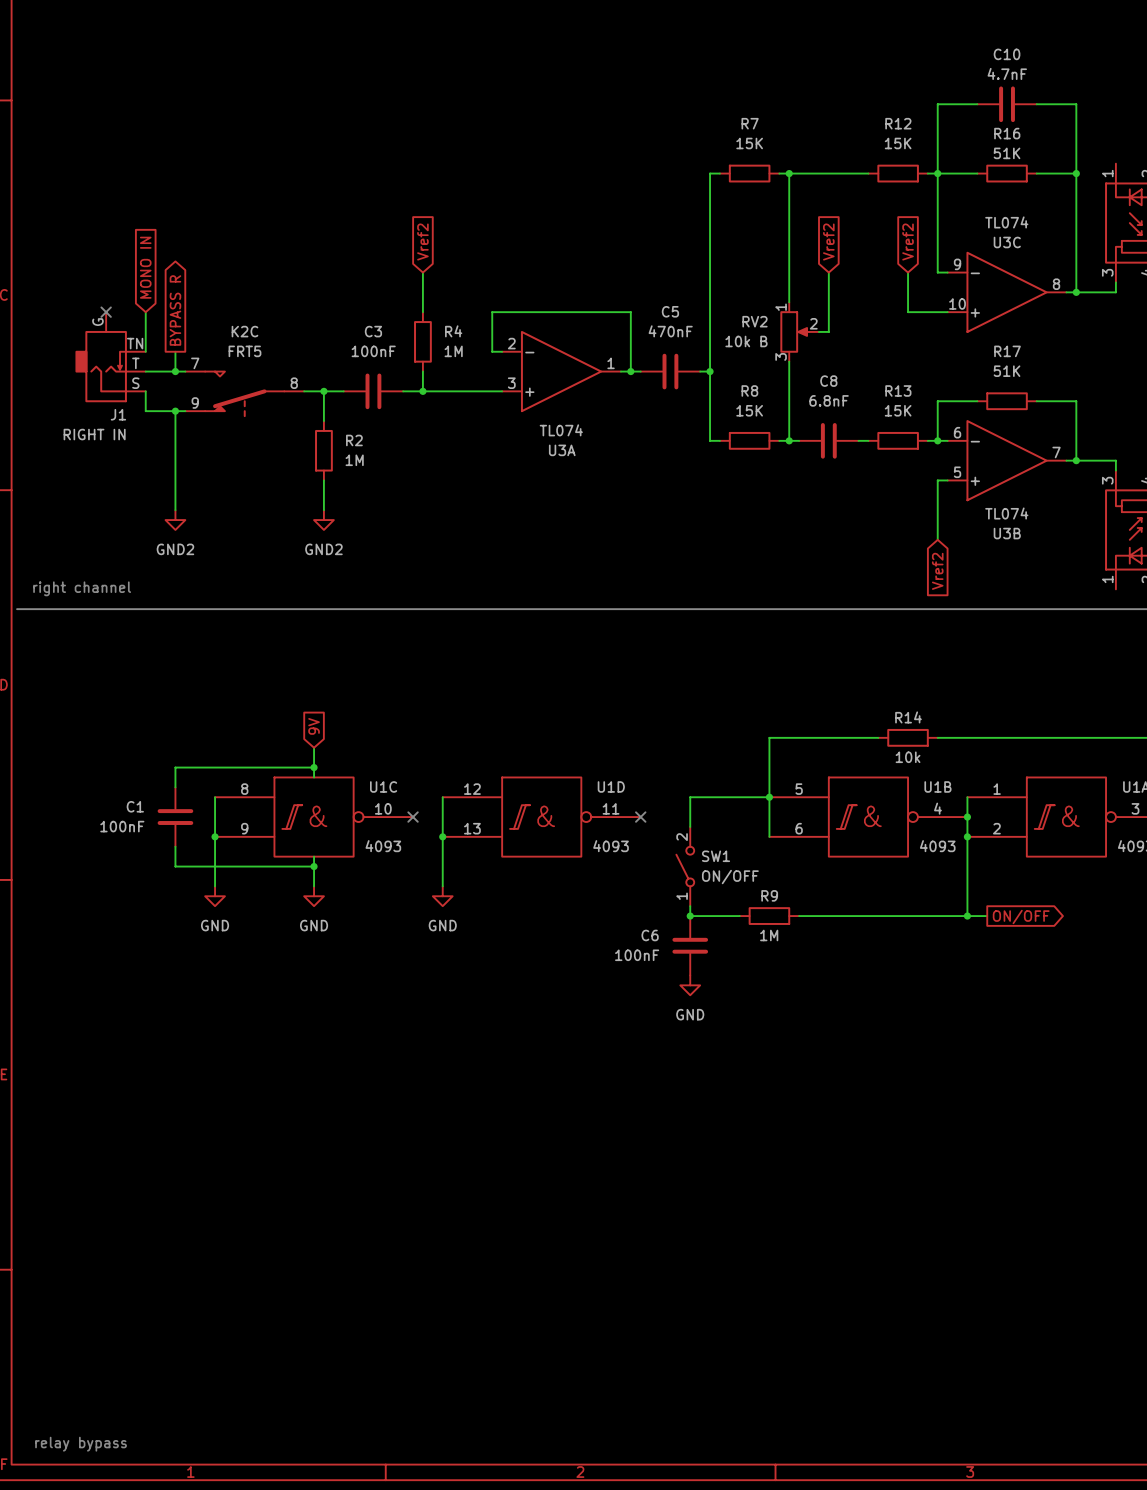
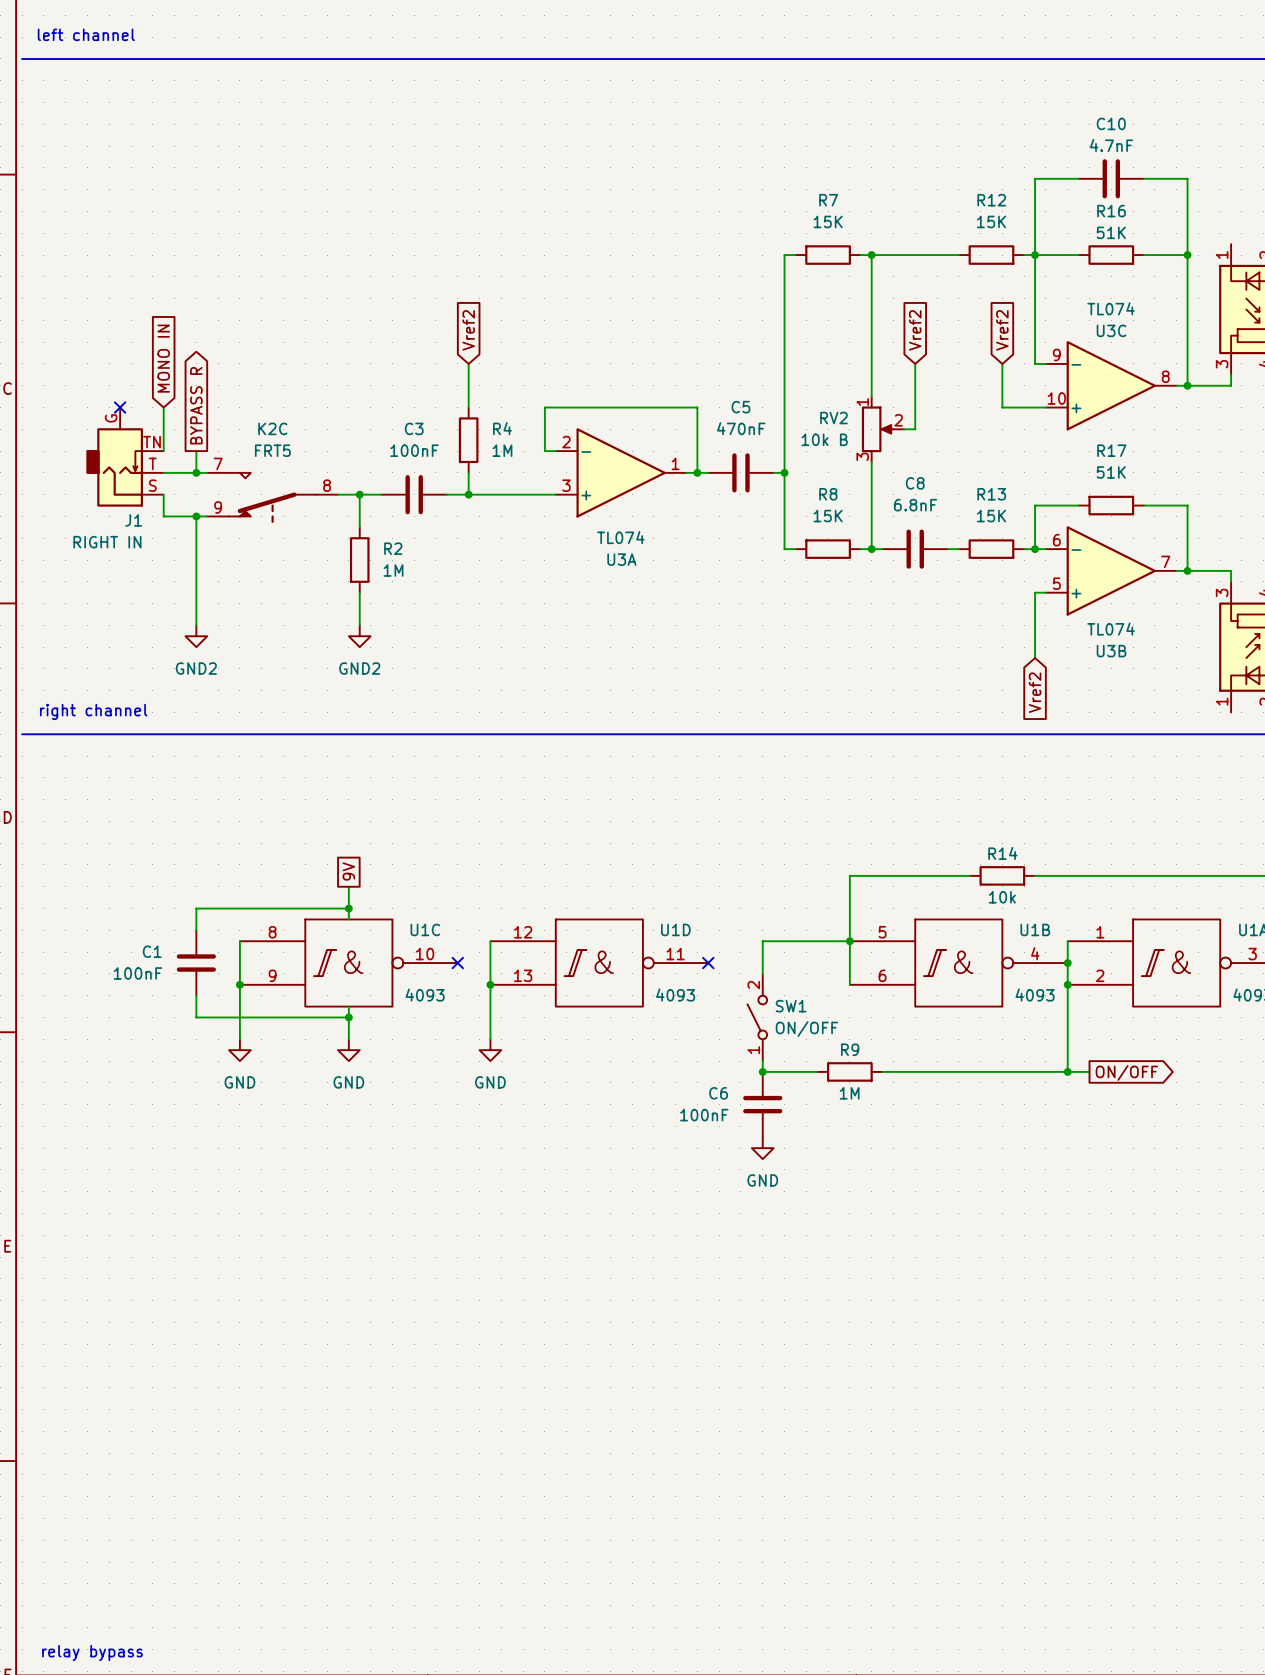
global label shape: input (314, 726) -> passive (348, 871)

